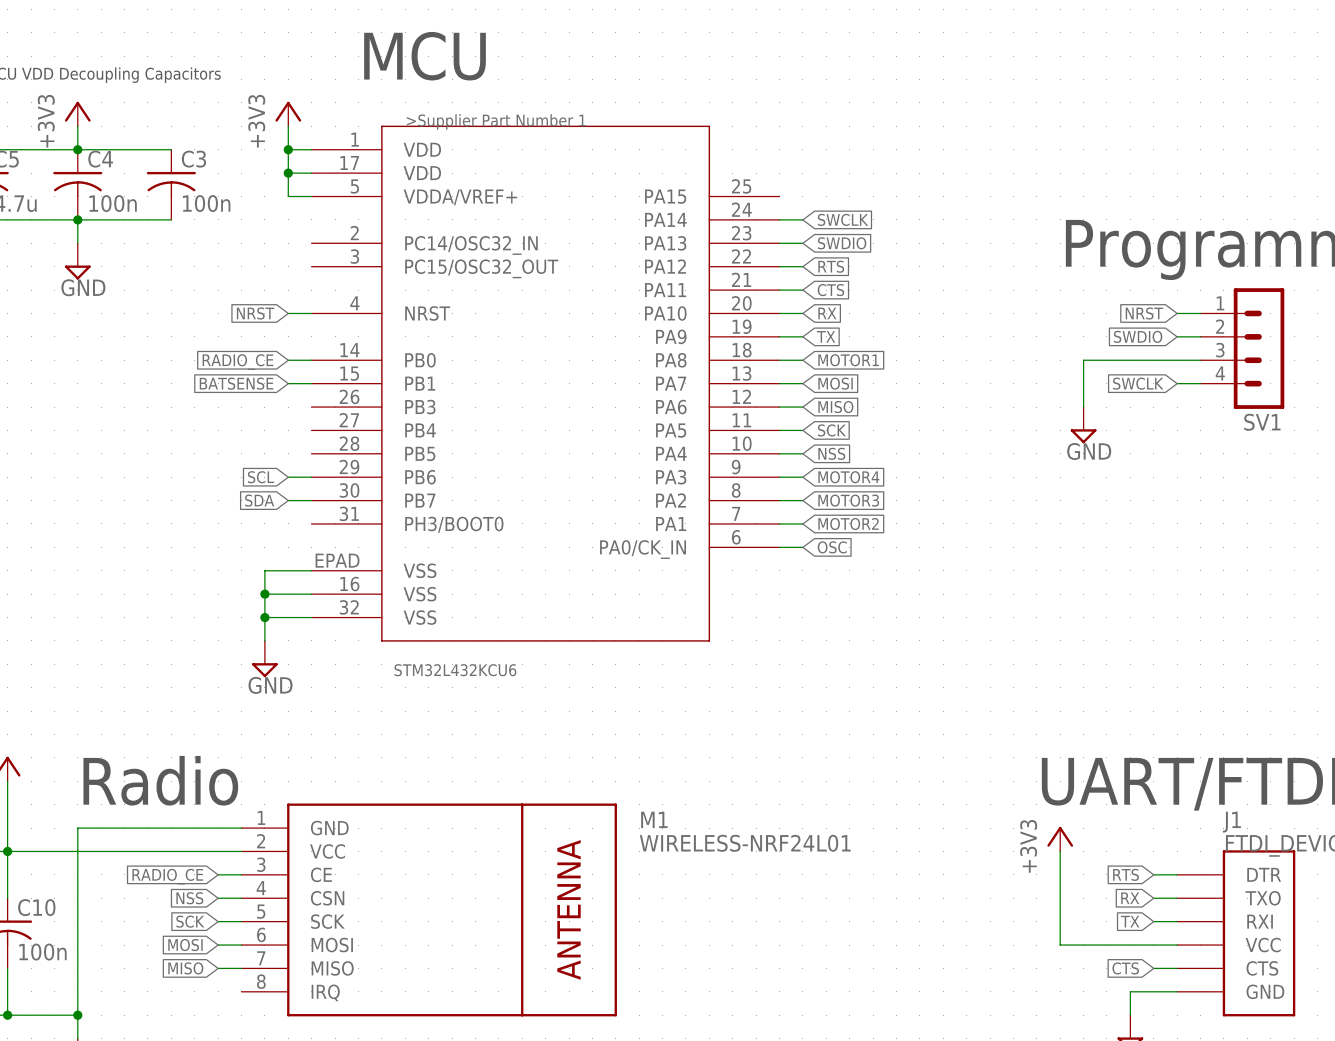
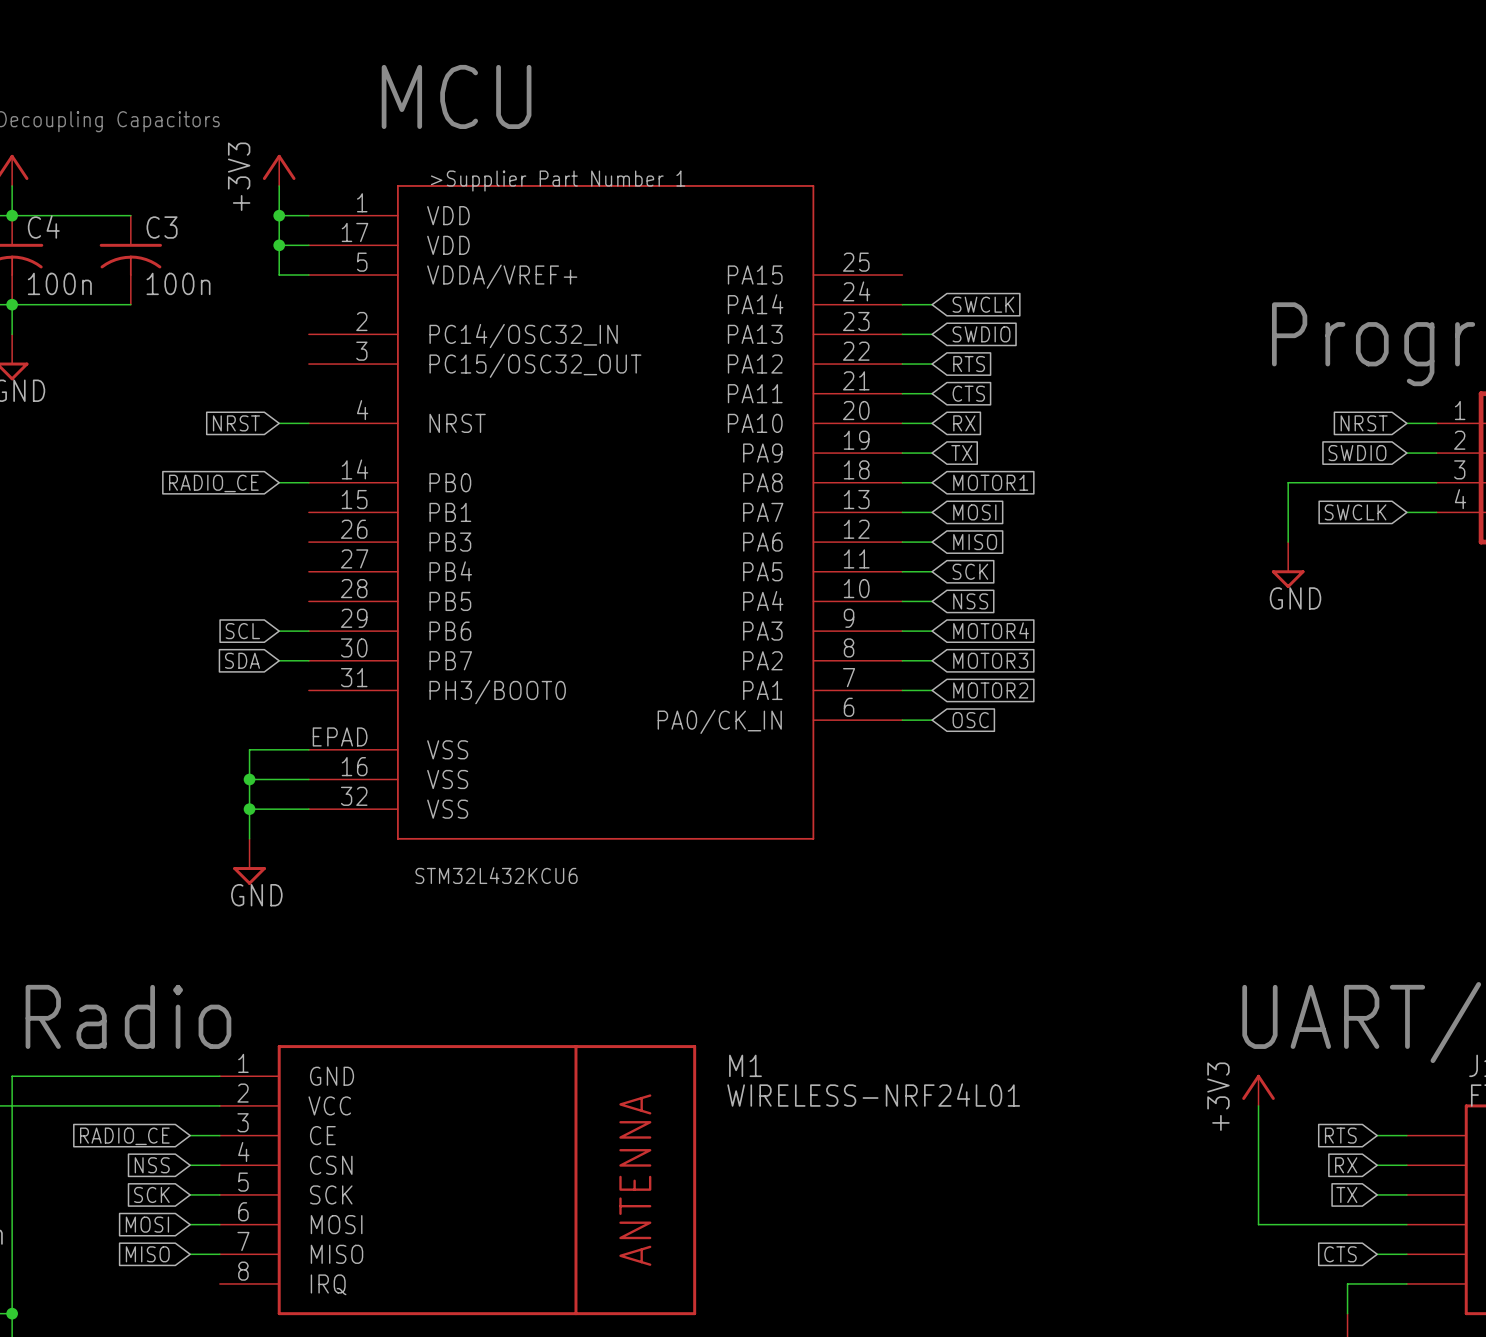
global label: BATSENSE (236, 383) -> none
wire: (288, 383) (311, 383) -> none

